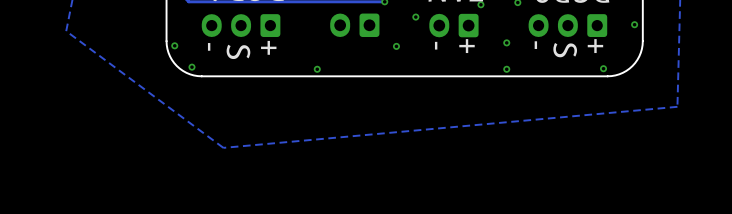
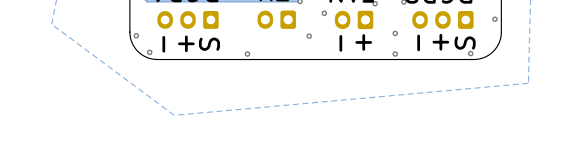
text: + (595, 46) -> S (465, 43)
text: + (268, 47) -> S (209, 44)
text: S (565, 50) -> + (440, 42)
text: S (238, 51) -> + (186, 43)

